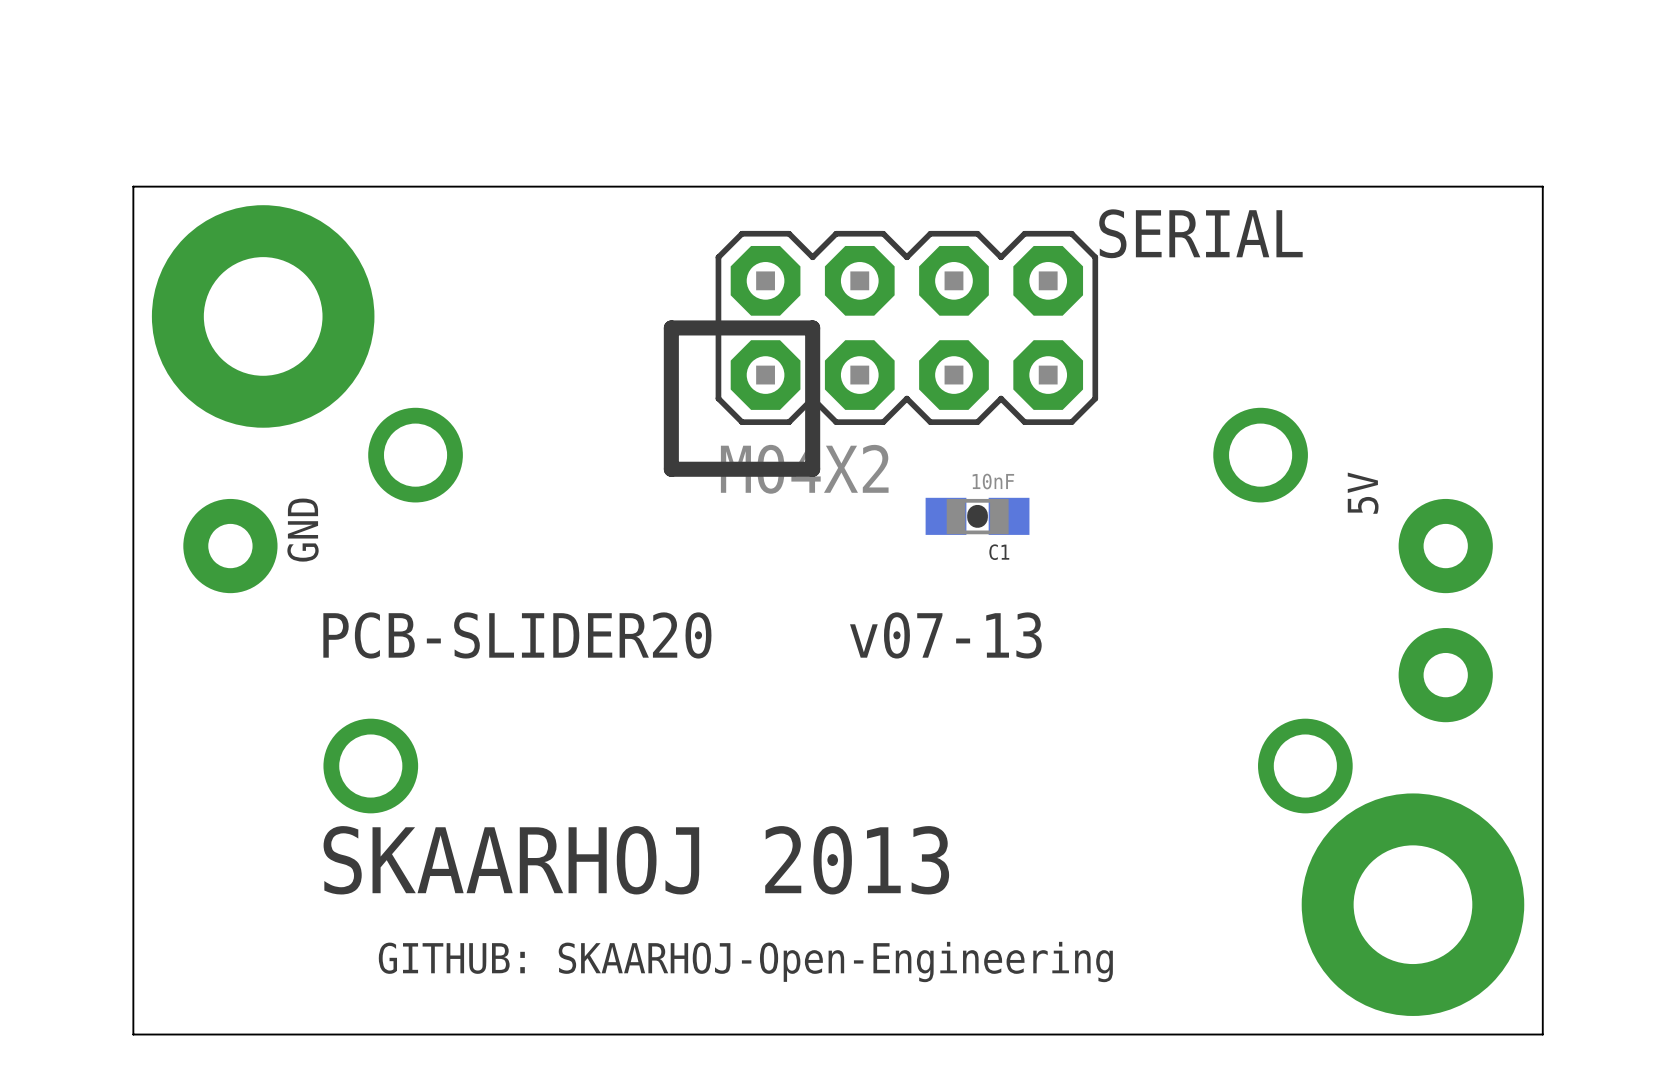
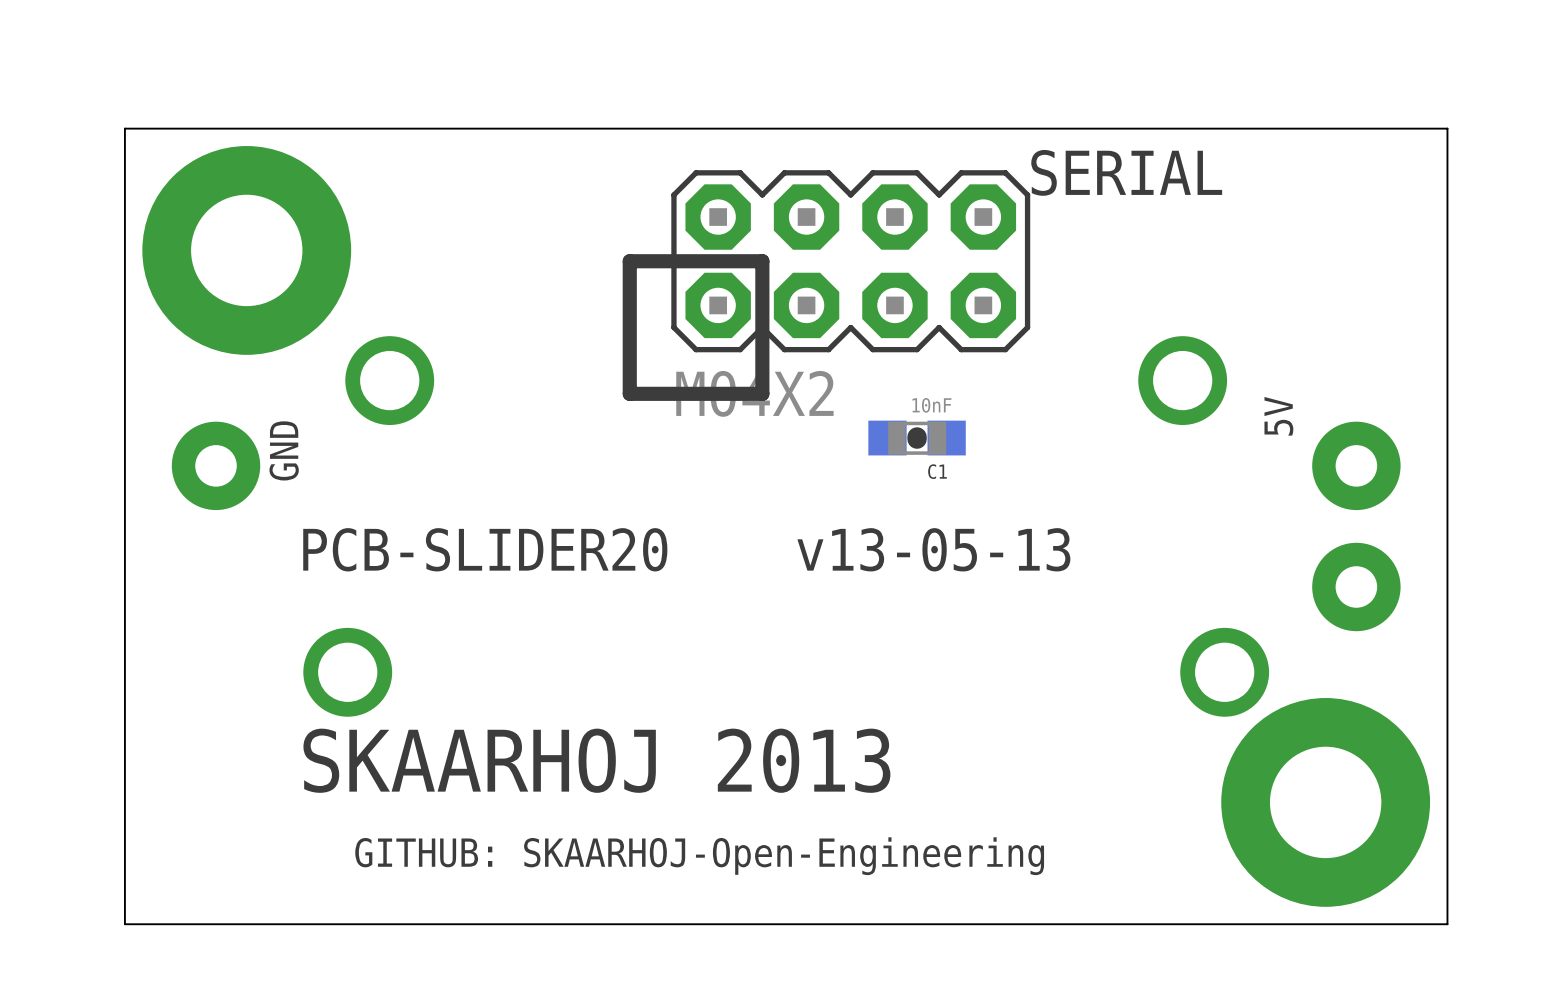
text: PCB-SLIDER20 v07-13 (682, 635) -> PCB-SLIDER20 v13-05-13 (686, 549)

